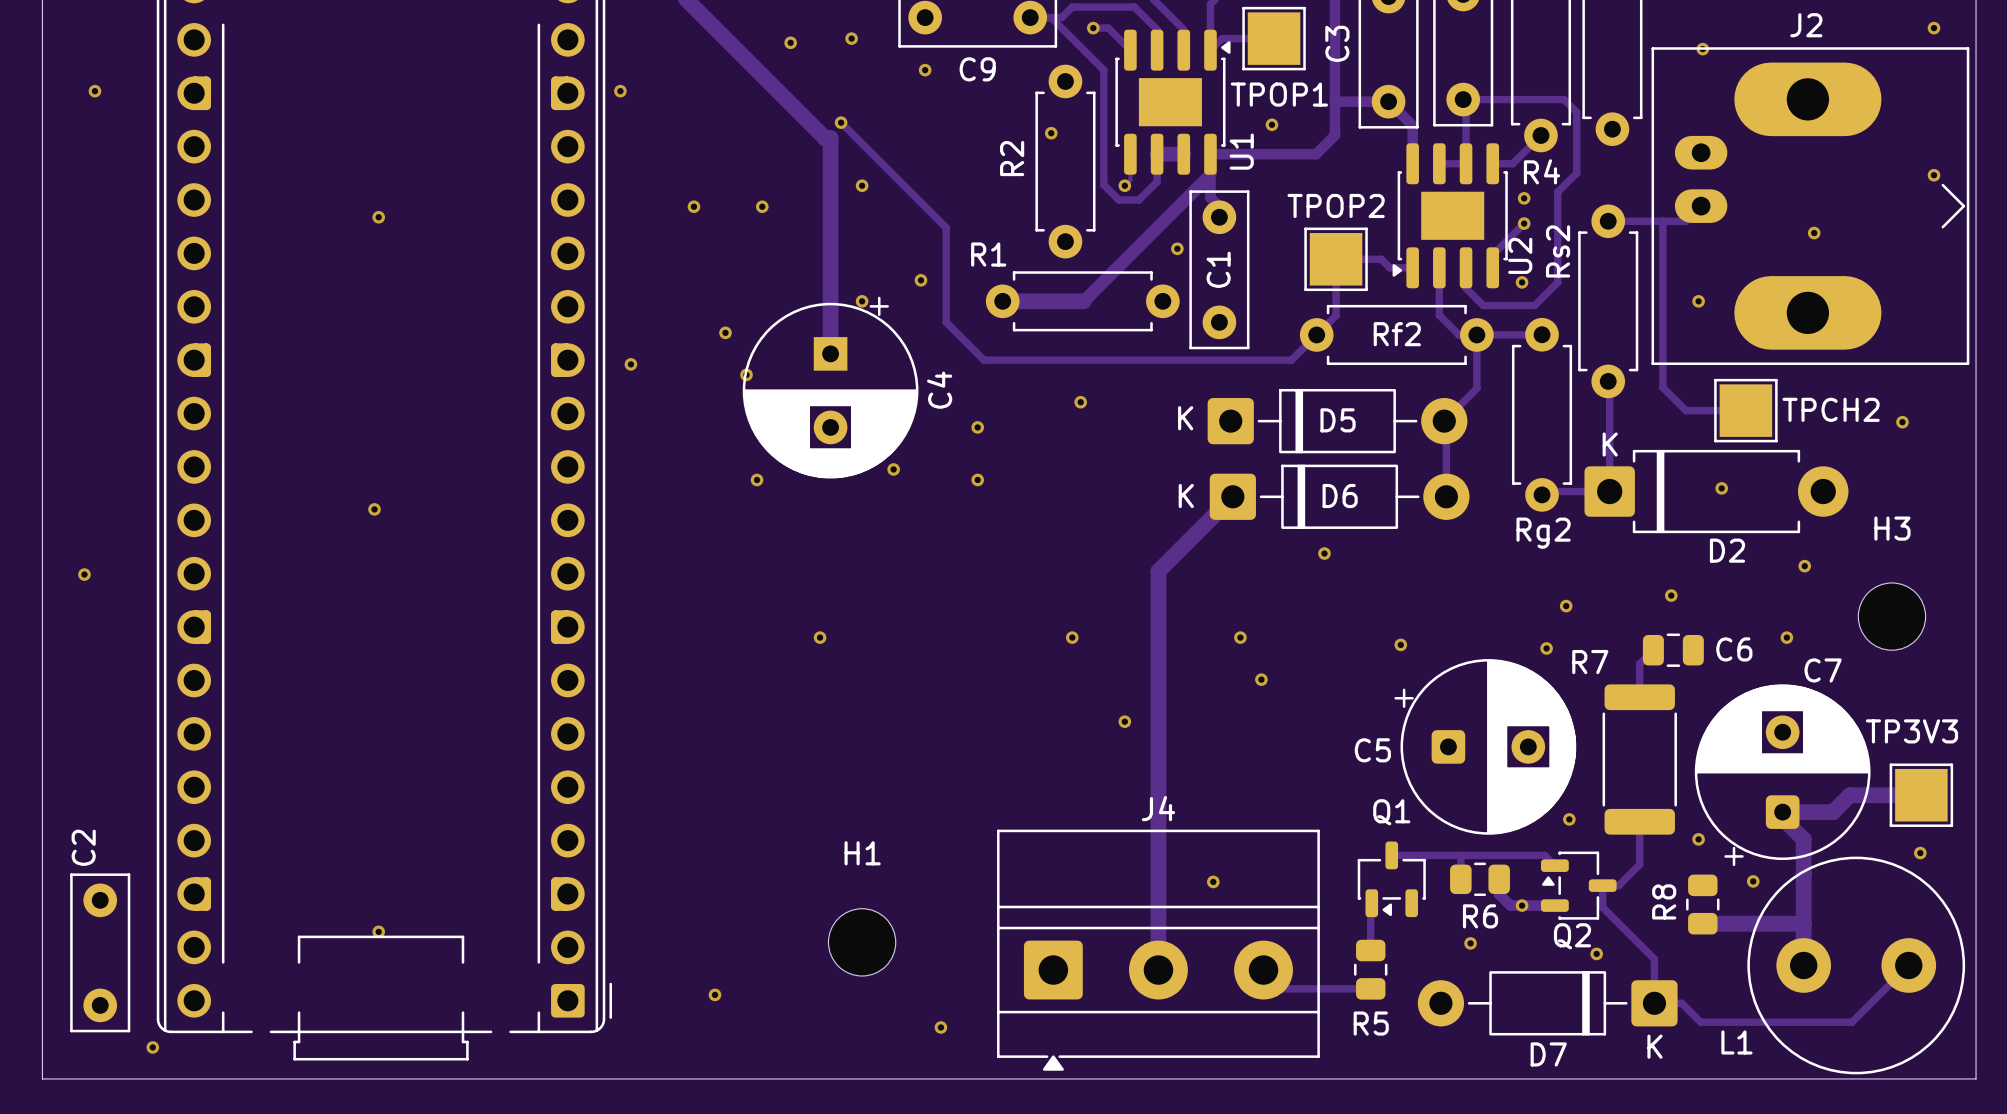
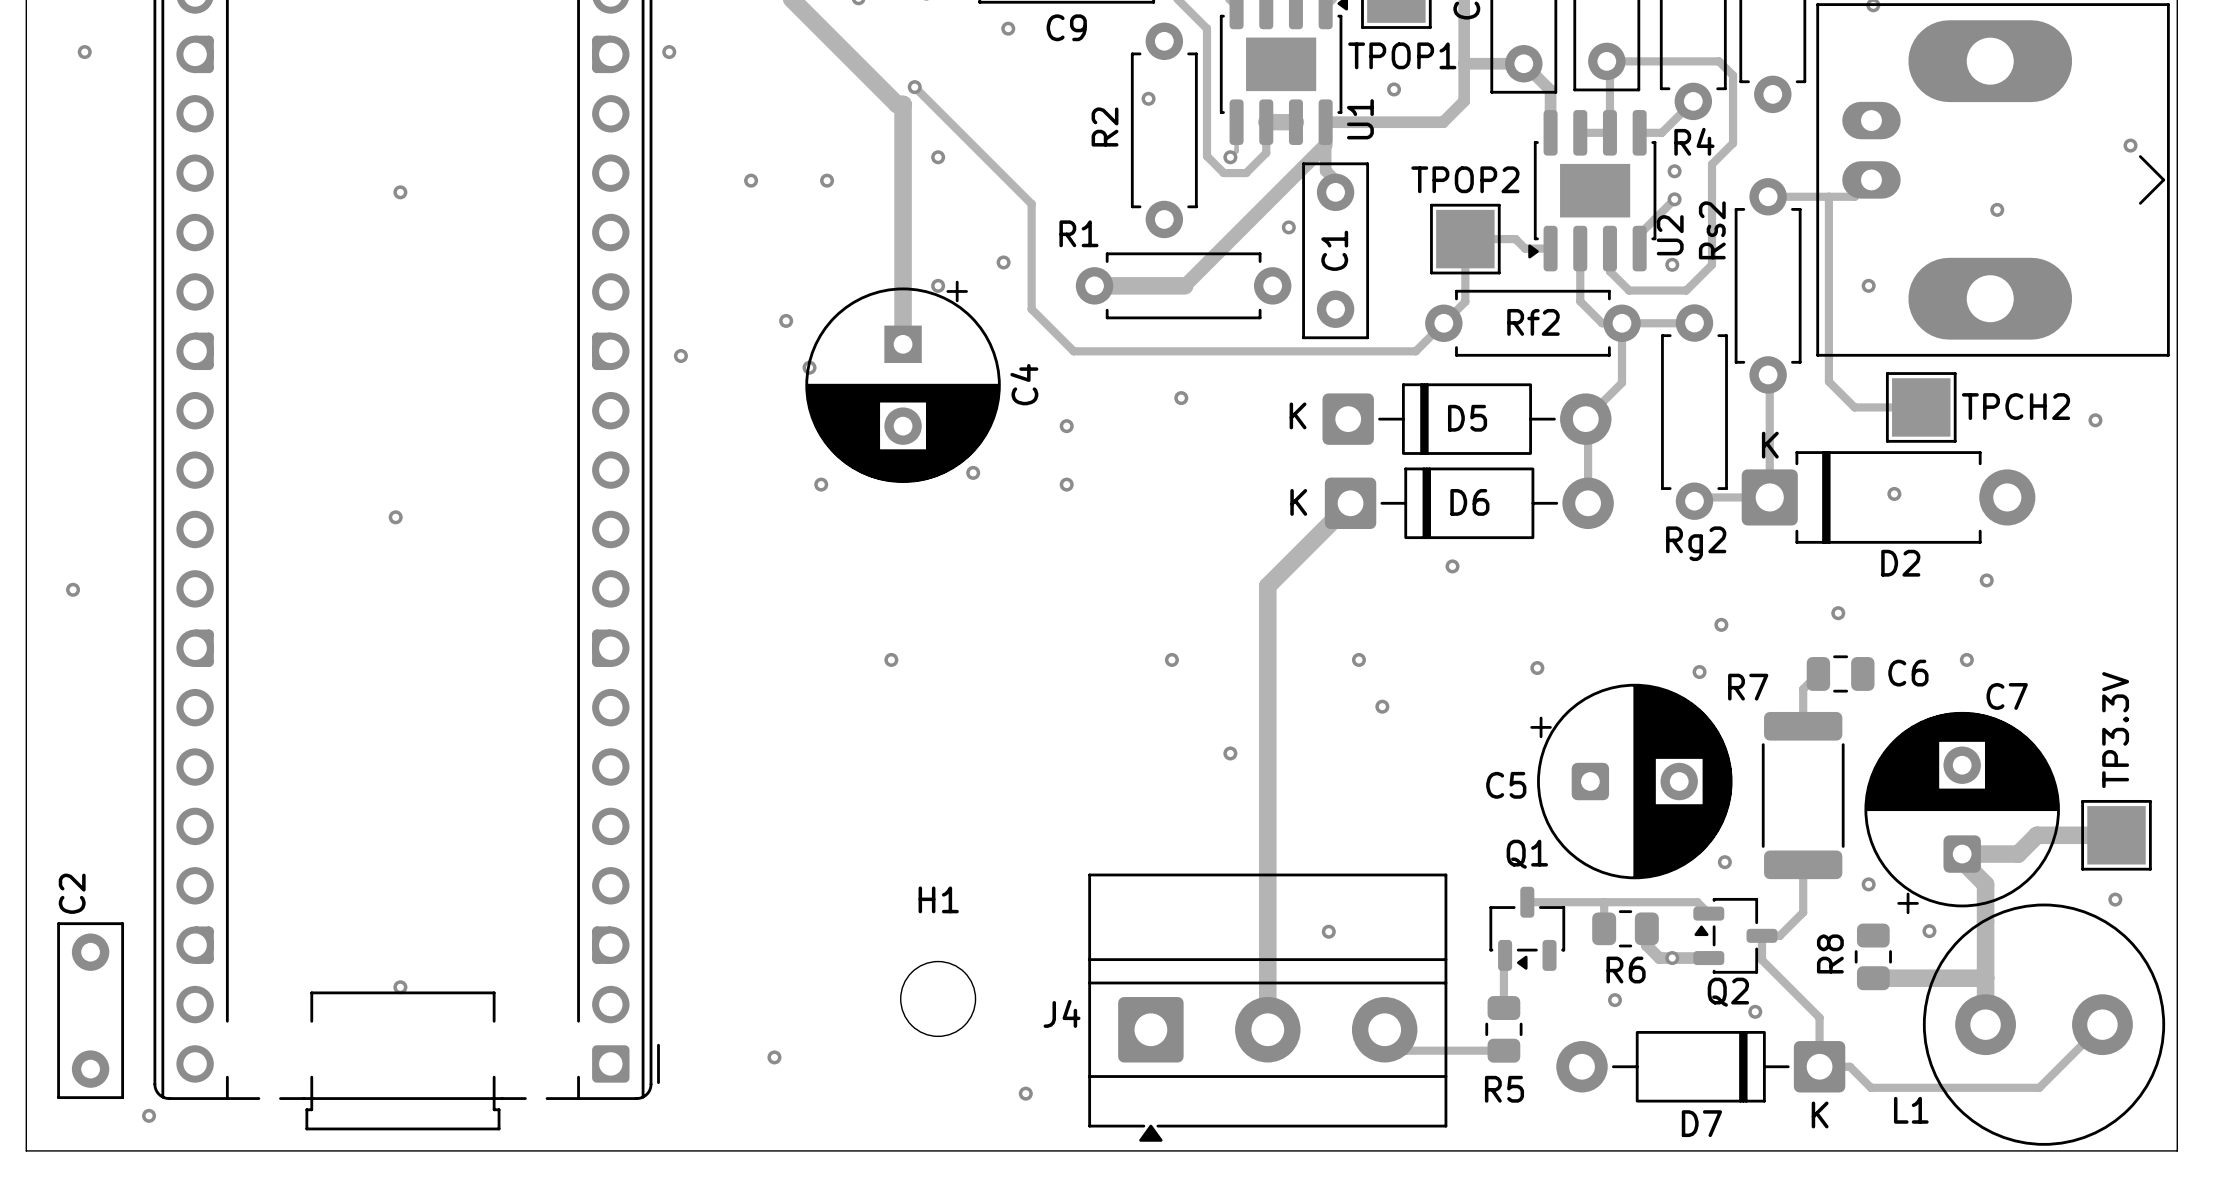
H3: (1891, 616) -> none
TP3V3 name: TP3V3 (1911, 731) -> TP3.3V (2115, 730)
J4 name position: J4 (1158, 808) -> J4 (1062, 1013)

